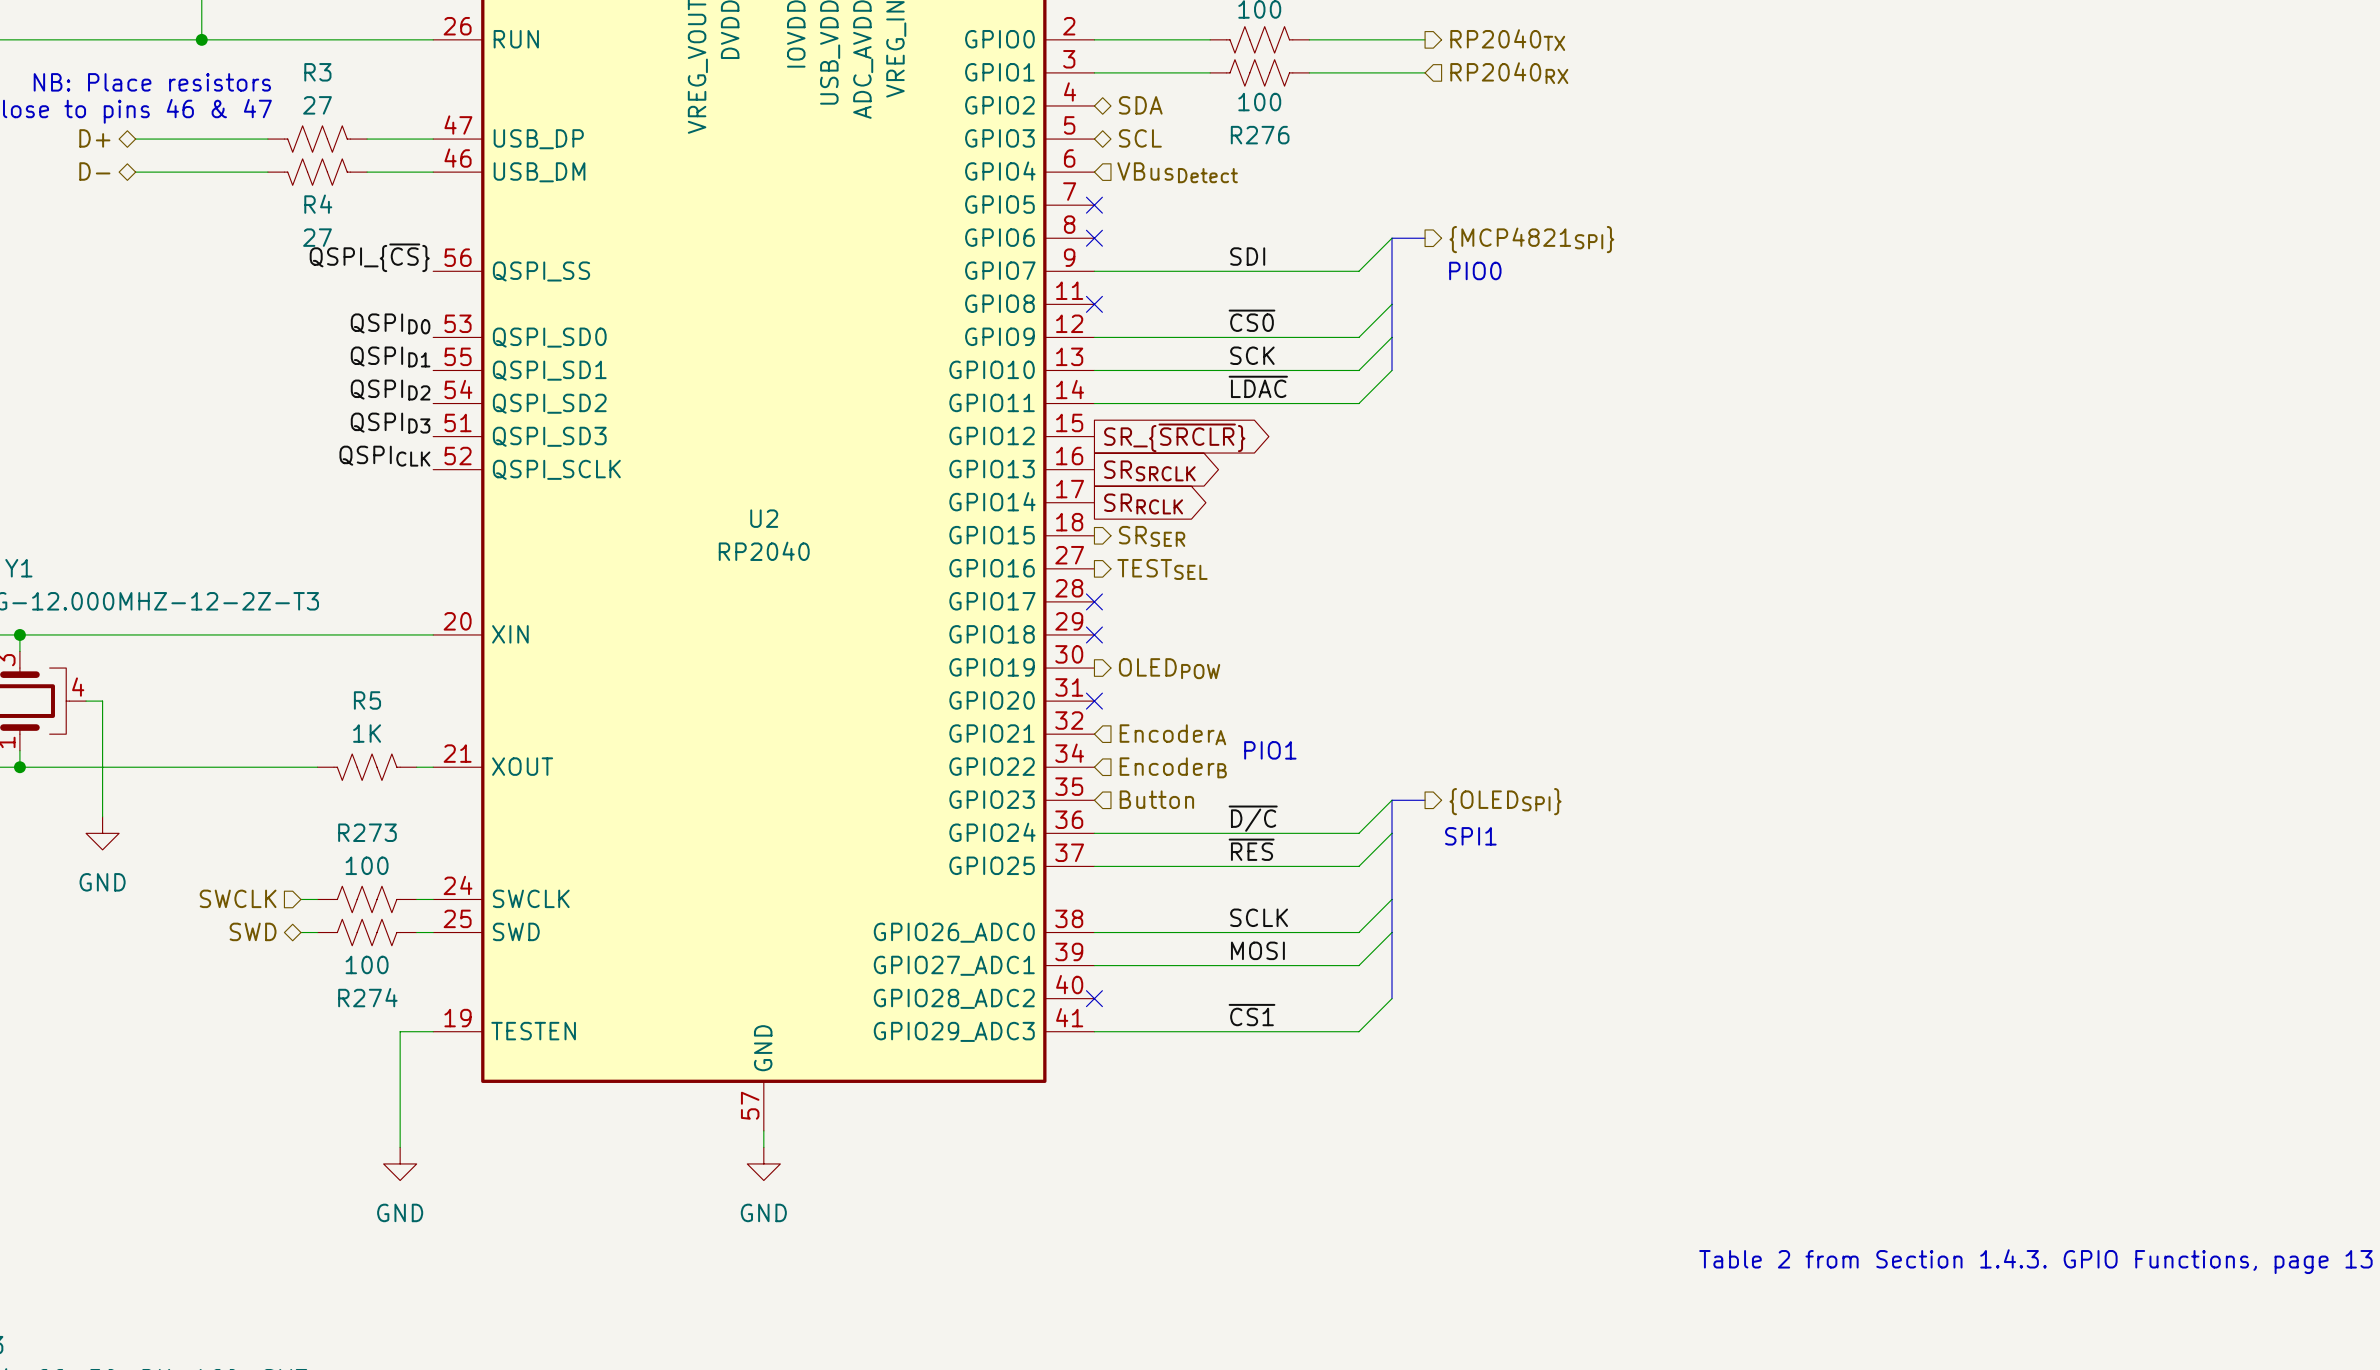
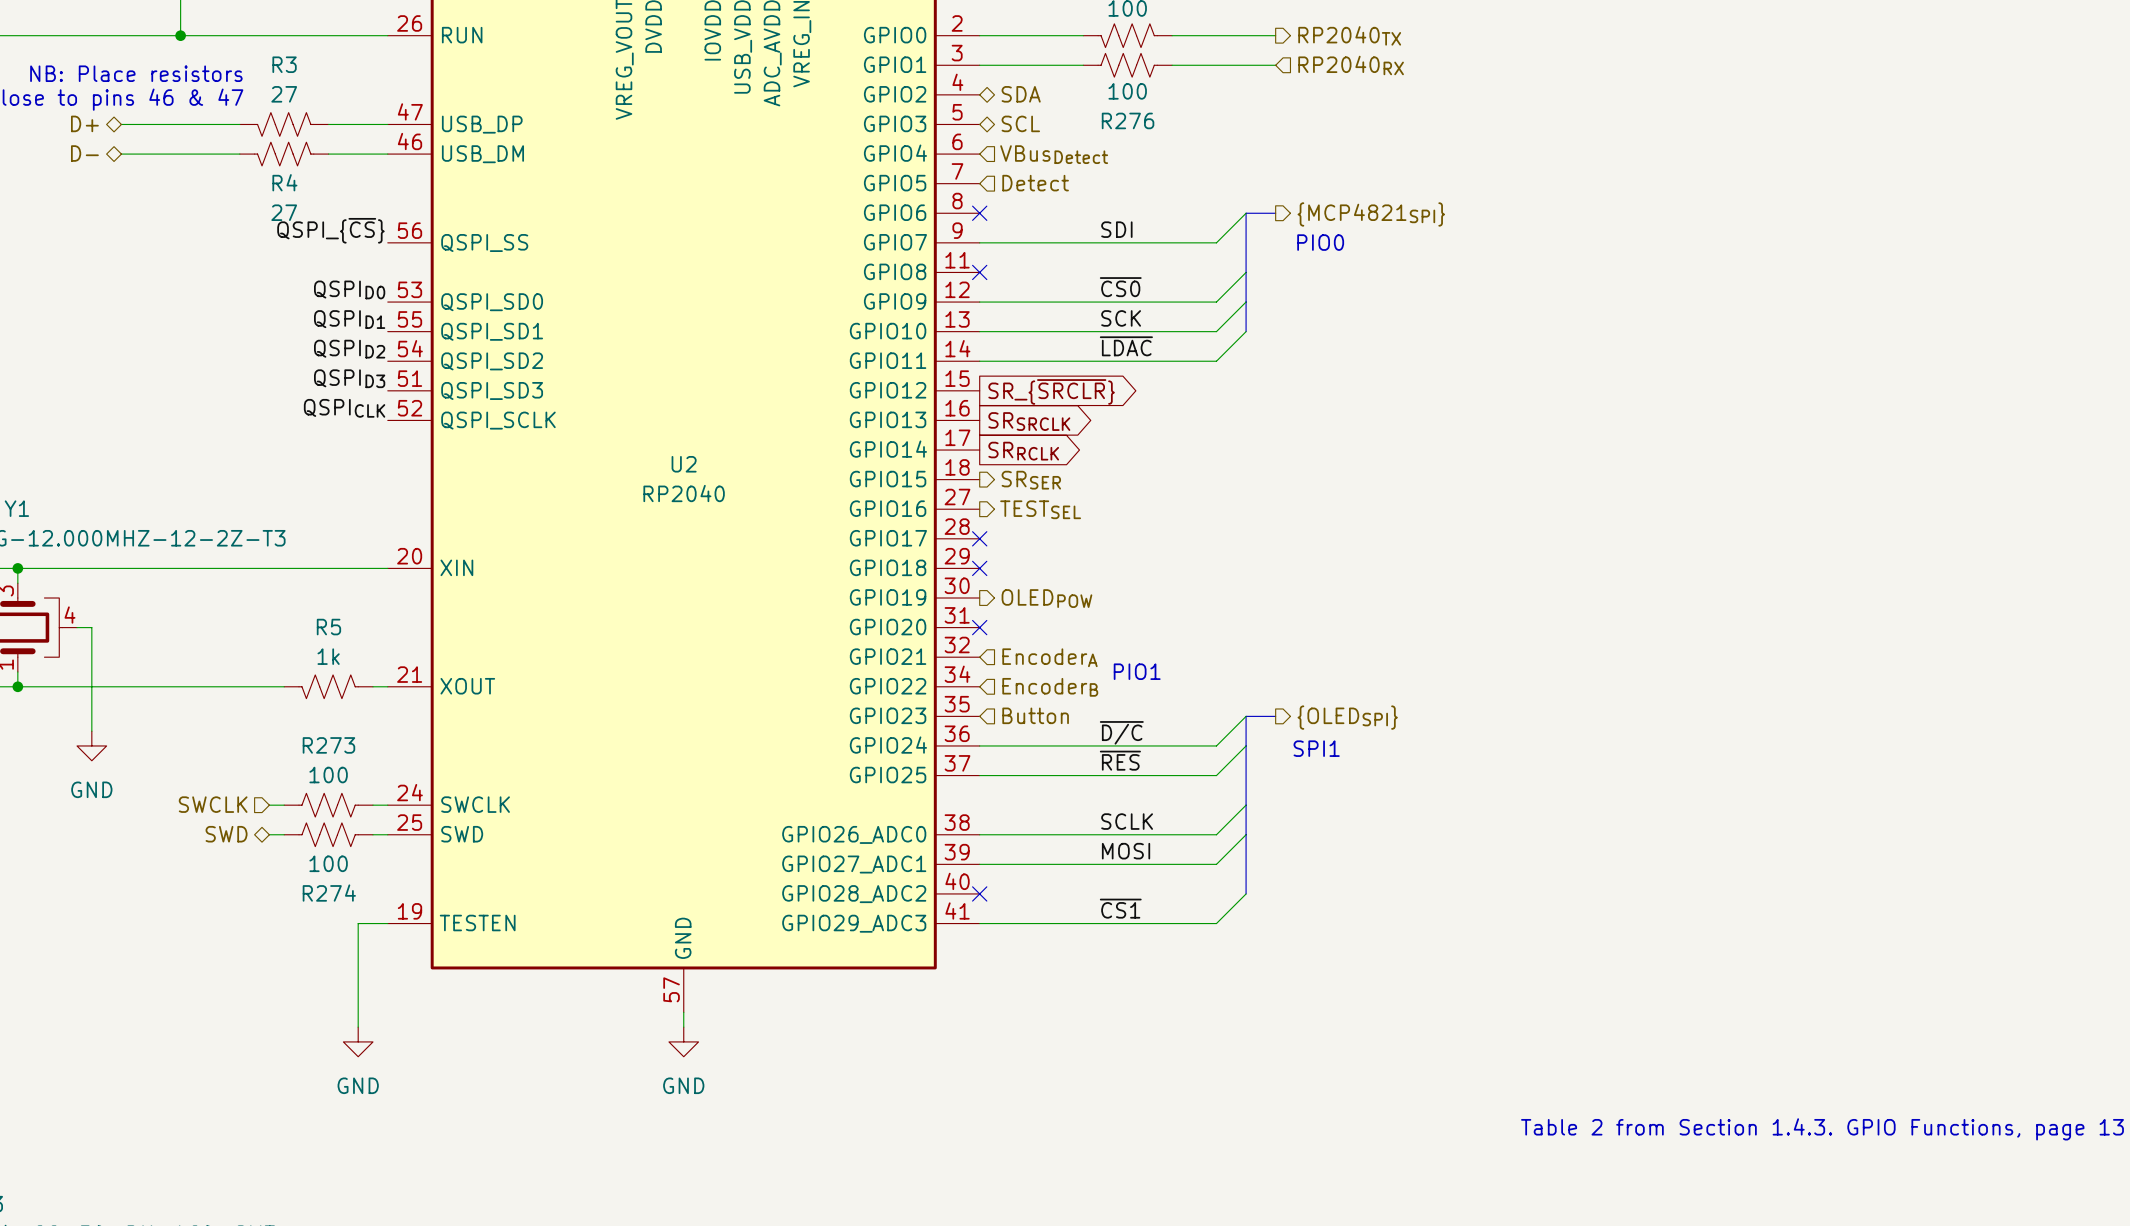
hierarchical label: none -> Detect (1035, 183)
no-connect mark: (1094, 205) -> none
R5 value: 1K (367, 733) -> 1k (328, 656)

